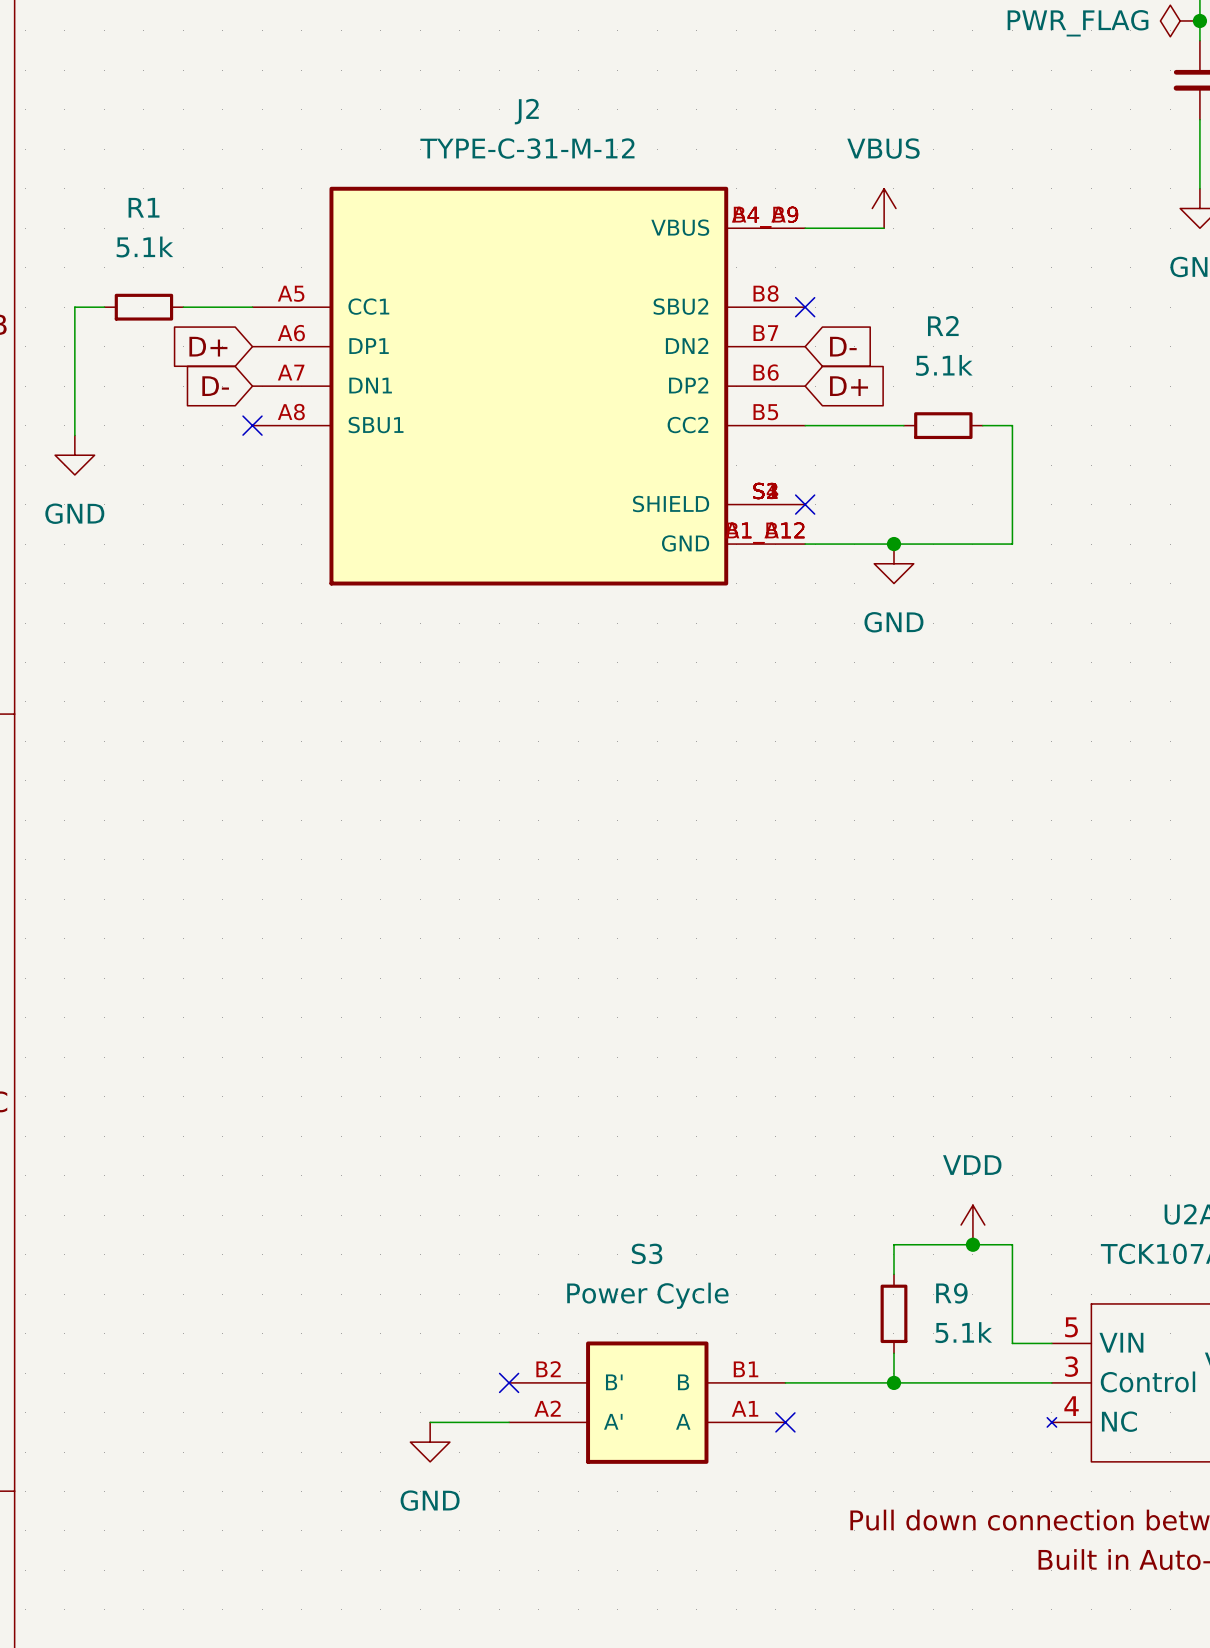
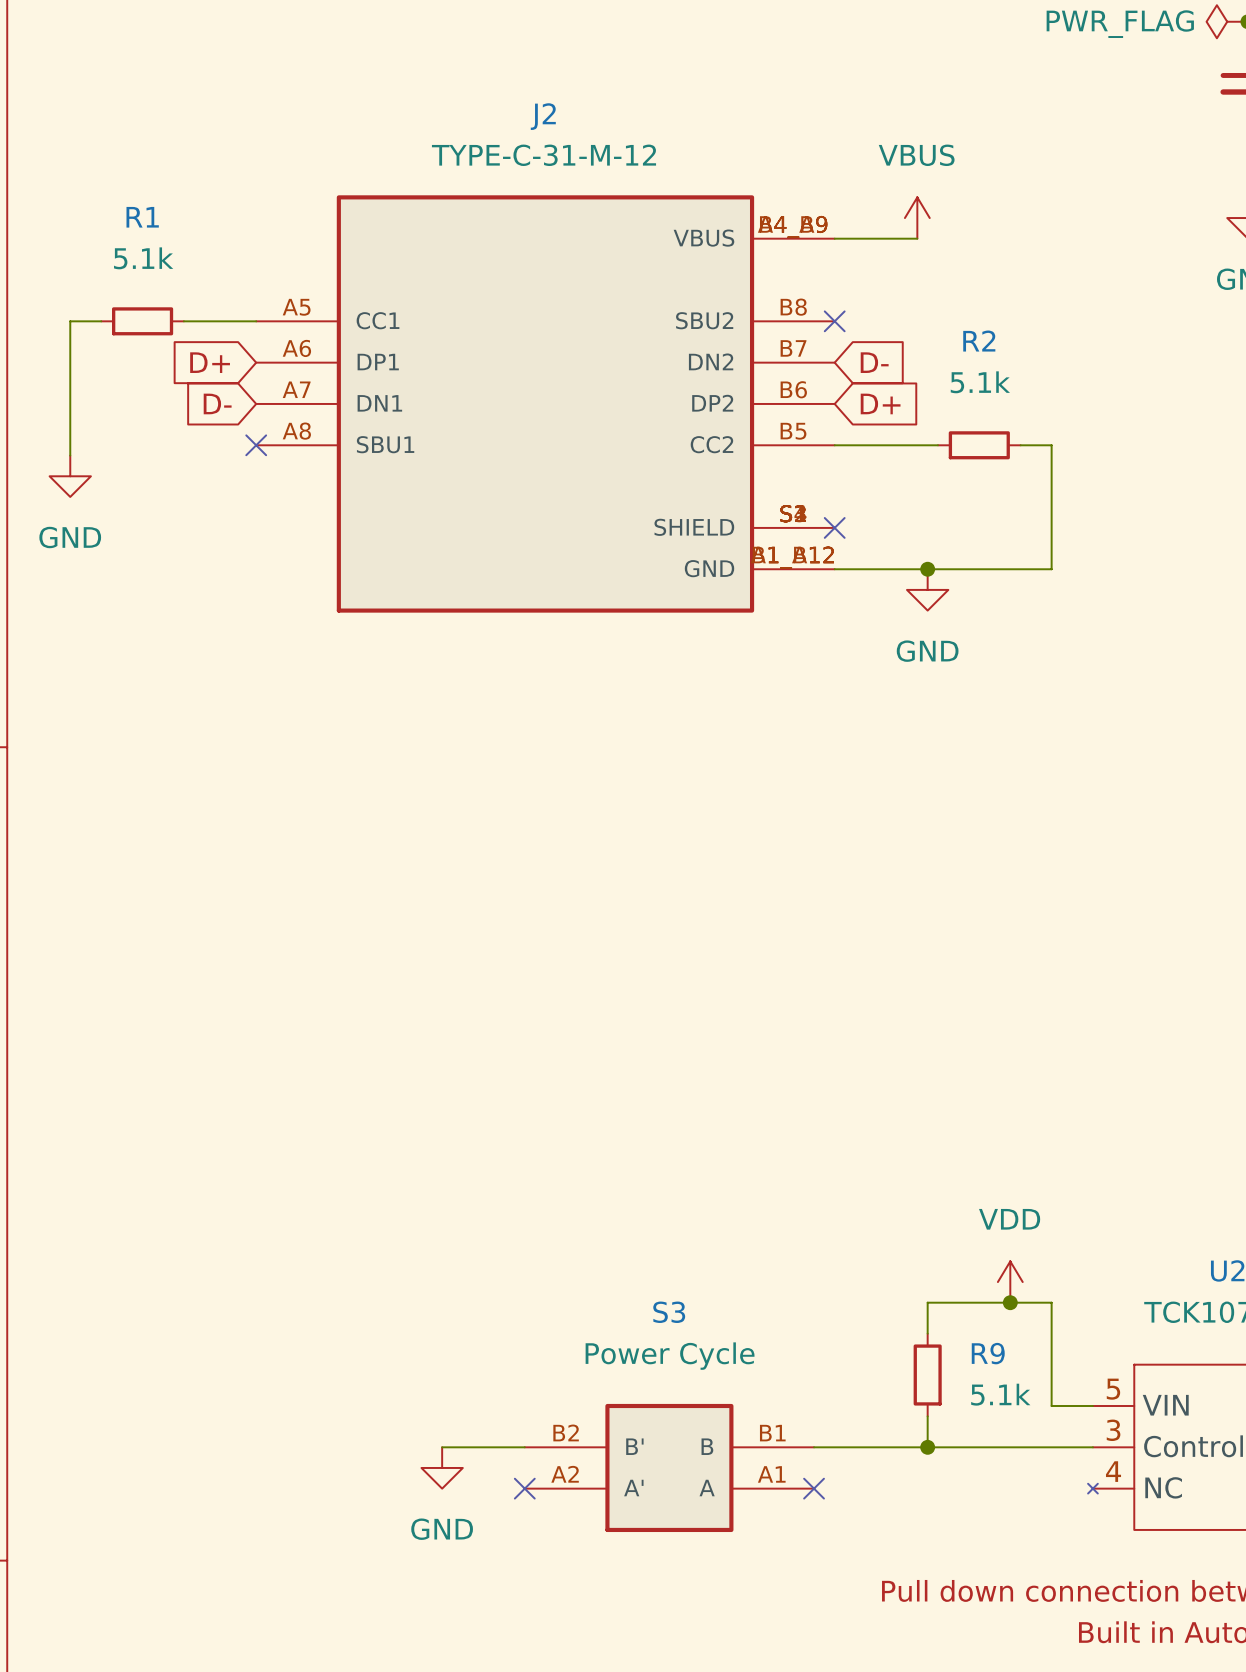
no-connect mark position: (509, 1382) -> (524, 1488)
wire: (430, 1422) (509, 1422) -> (442, 1447) (524, 1447)
power symbol position: GND (430, 1442) -> GND (442, 1467)

